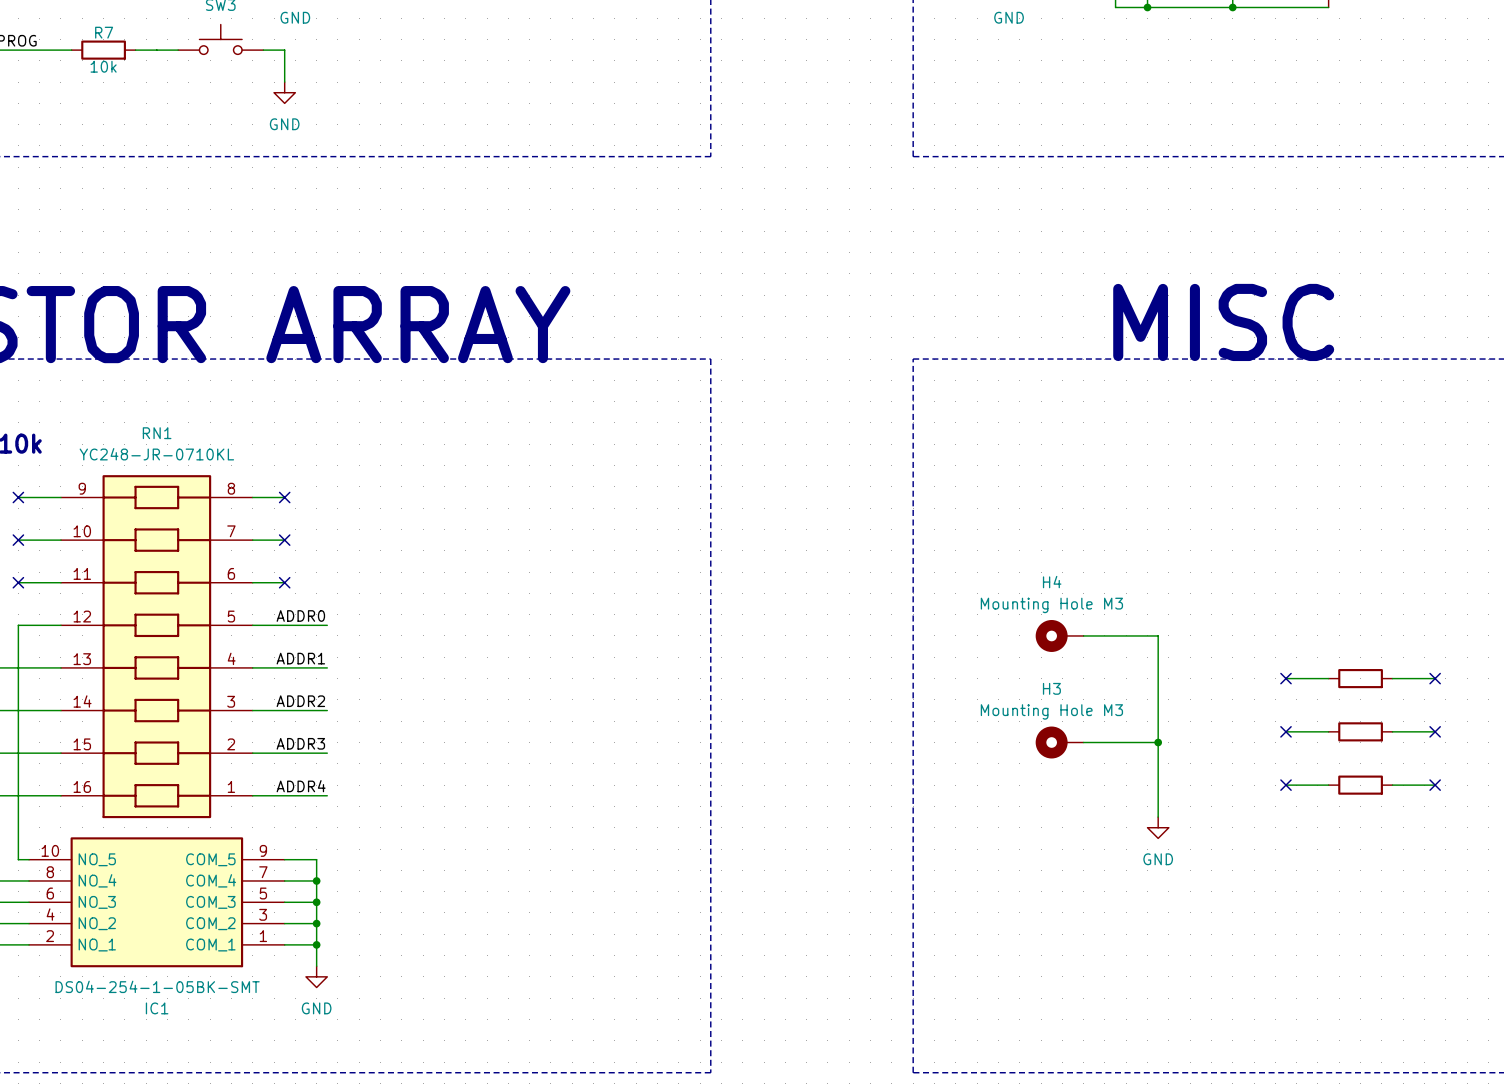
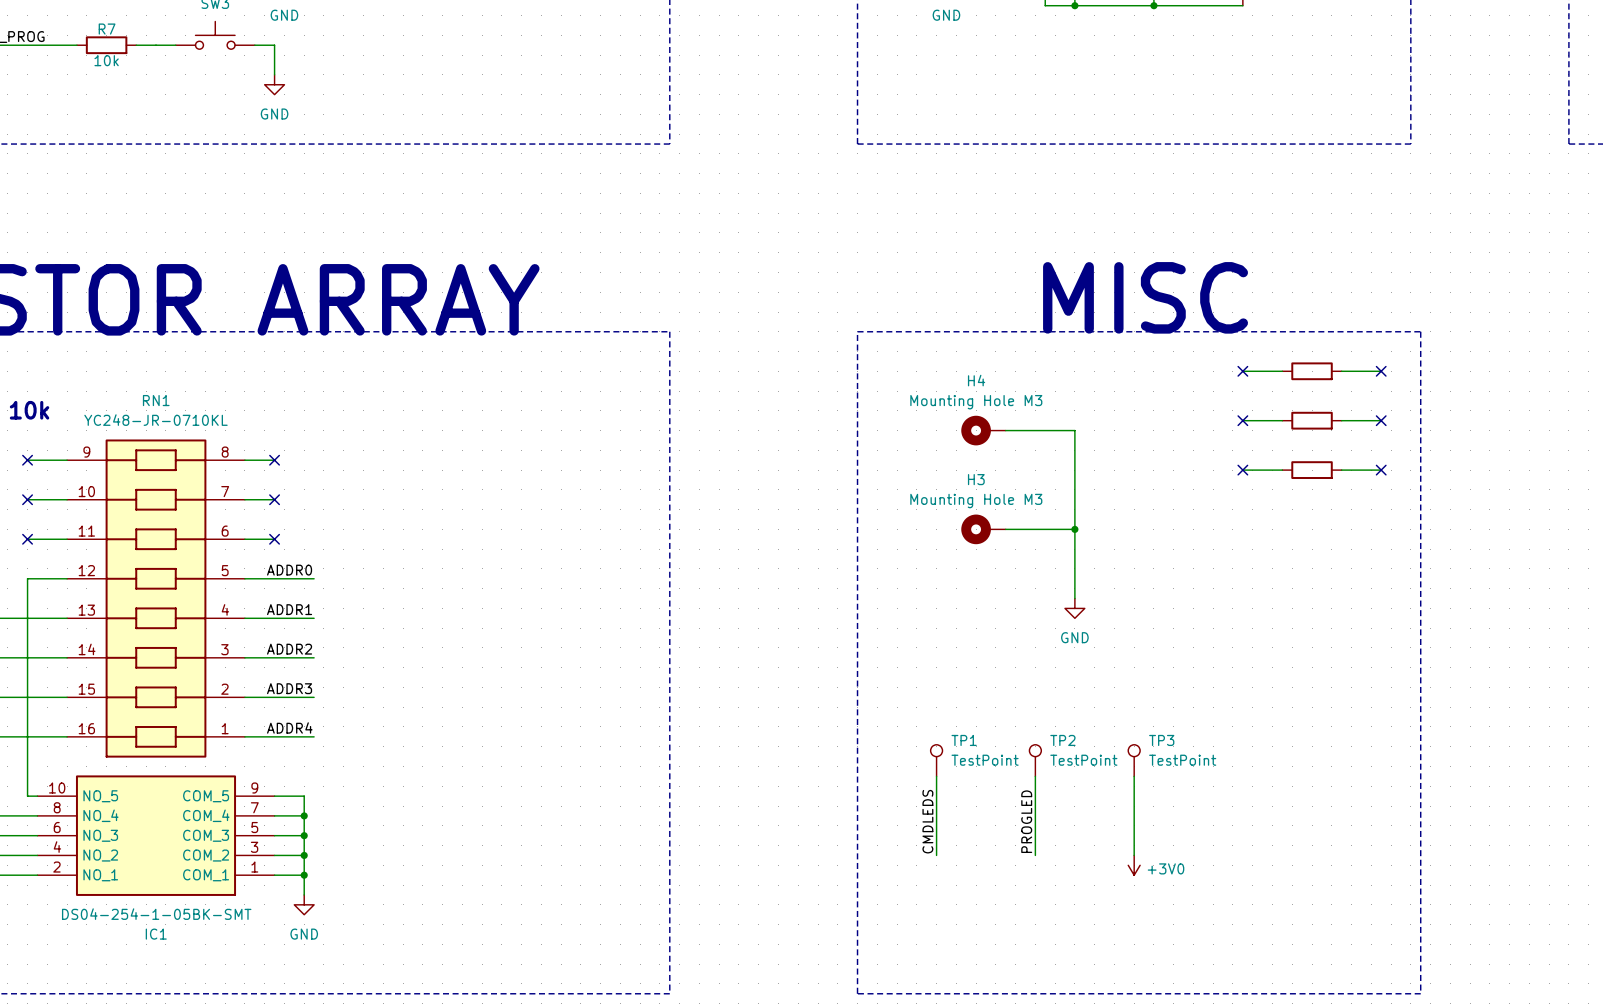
wire: none -> (1242, 371) (1282, 371)
no-connect mark: none -> (1242, 371)
part: none -> (1312, 371)
wire: none -> (1341, 371) (1381, 371)
no-connect mark: none -> (1381, 371)
wire: none -> (1242, 420) (1282, 420)
no-connect mark: none -> (1242, 420)
part: none -> (1312, 420)
wire: none -> (1341, 420) (1381, 420)
no-connect mark: none -> (1381, 420)
no-connect mark: none -> (1242, 470)
part: none -> (1312, 470)
no-connect mark: none -> (1381, 470)
junction: none -> (1074, 529)
H4 position: (1059, 635) -> (983, 430)
wire: (1083, 635) (1158, 635) (1158, 817) -> (1005, 430) (1074, 430) (1074, 598)
wire: (1286, 678) (1328, 678) -> (1242, 470) (1282, 470)
no-connect mark: (1286, 678) -> none
part: (1360, 678) -> none
wire: (1392, 678) (1435, 678) -> (1341, 470) (1381, 470)
no-connect mark: (1435, 678) -> none
wire: (1286, 731) (1328, 731) -> none
no-connect mark: (1286, 731) -> none
part: (1360, 731) -> none
wire: (1392, 731) (1435, 731) -> none
no-connect mark: (1435, 731) -> none
H3 position: (1059, 742) -> (983, 529)
wire: (1083, 742) (1158, 742) -> (1005, 529) (1074, 529)
junction: (1158, 742) -> none
wire: (1286, 785) (1328, 785) -> none
no-connect mark: (1286, 785) -> none
part: (1360, 785) -> none
wire: (1392, 785) (1435, 785) -> none
no-connect mark: (1435, 785) -> none
TP1: none -> TestPoint (936, 760)
TP2: none -> TestPoint (1035, 760)
TP3: none -> TestPoint (1134, 760)
power symbol position: GND (1158, 827) -> GND (1074, 608)
wire: none -> (936, 776) (936, 855)
wire: none -> (1035, 776) (1035, 855)
wire: none -> (1134, 776) (1134, 855)
label: none -> CMDLEDS (927, 821)
label: none -> PROGLED (1026, 821)
power symbol: none -> +3V0 (1134, 865)

